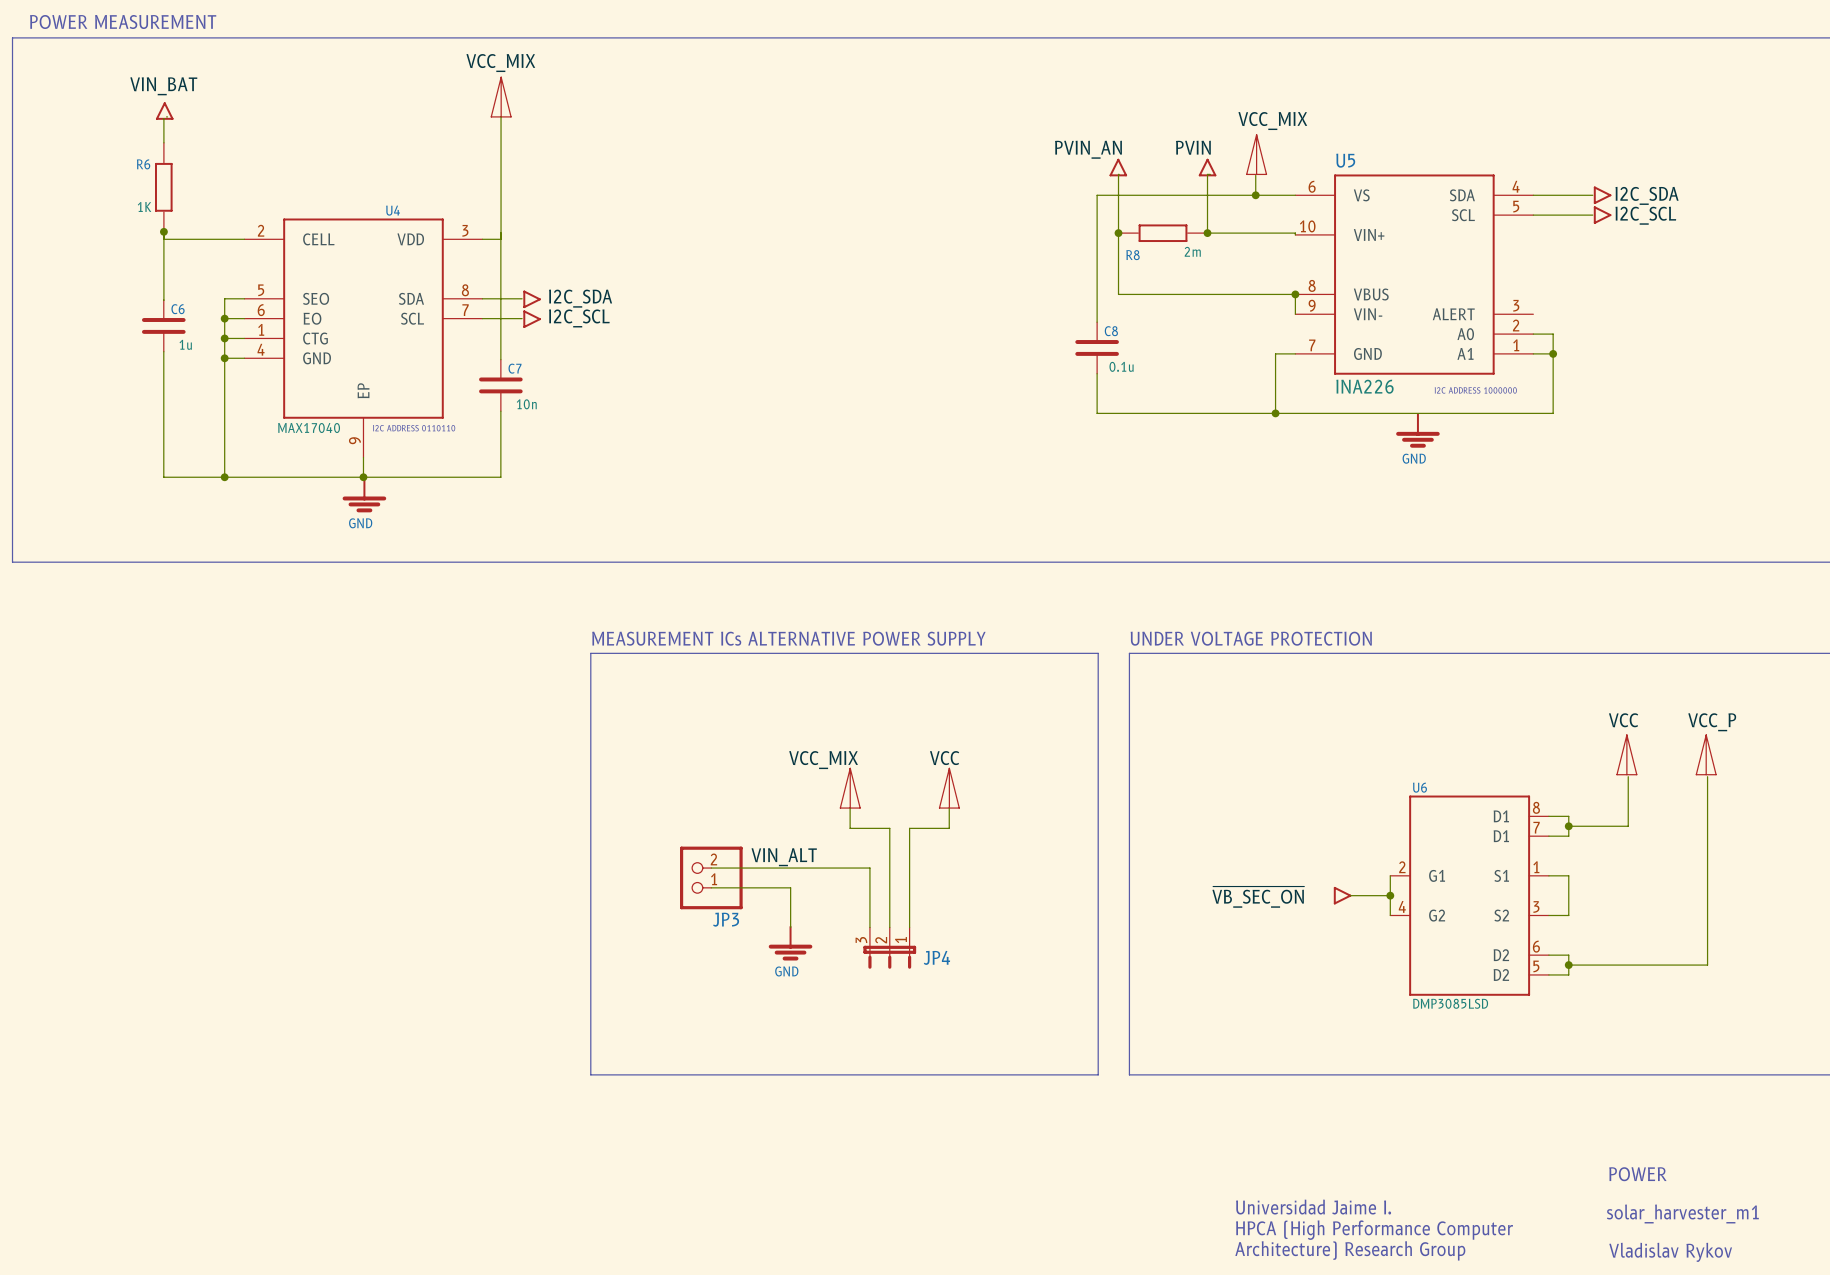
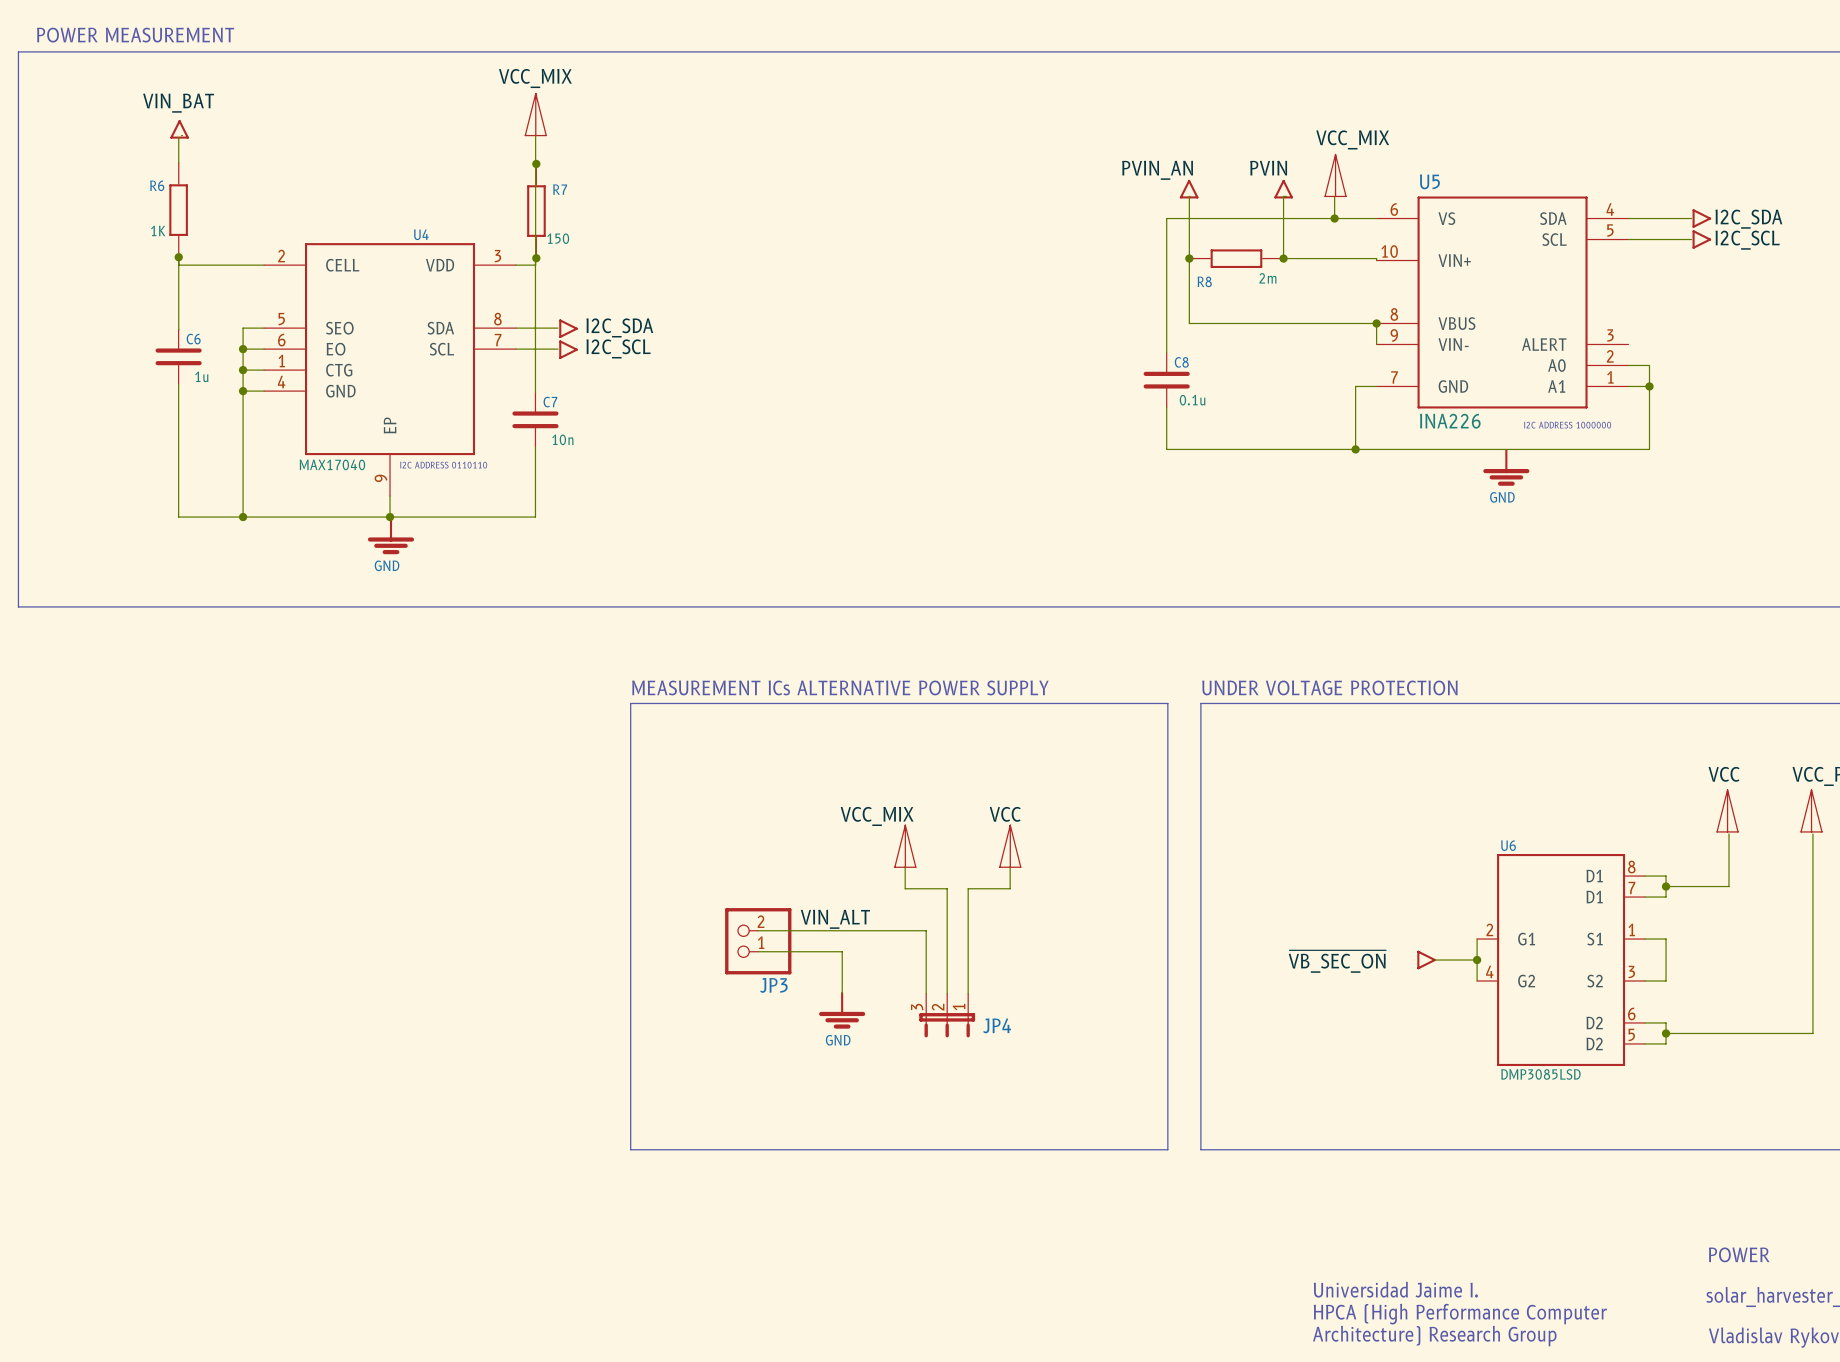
junction: none -> (536, 163)
R7: none -> 150 (536, 211)
junction: none -> (536, 258)

